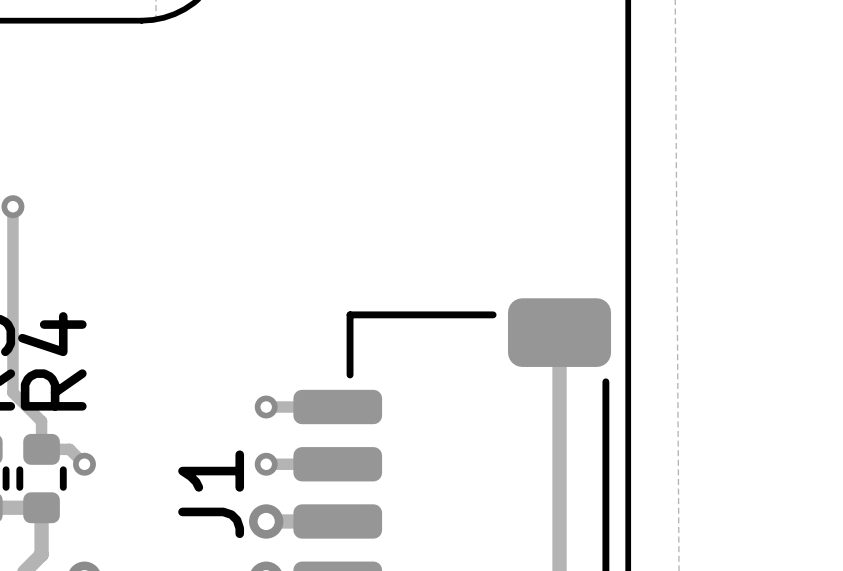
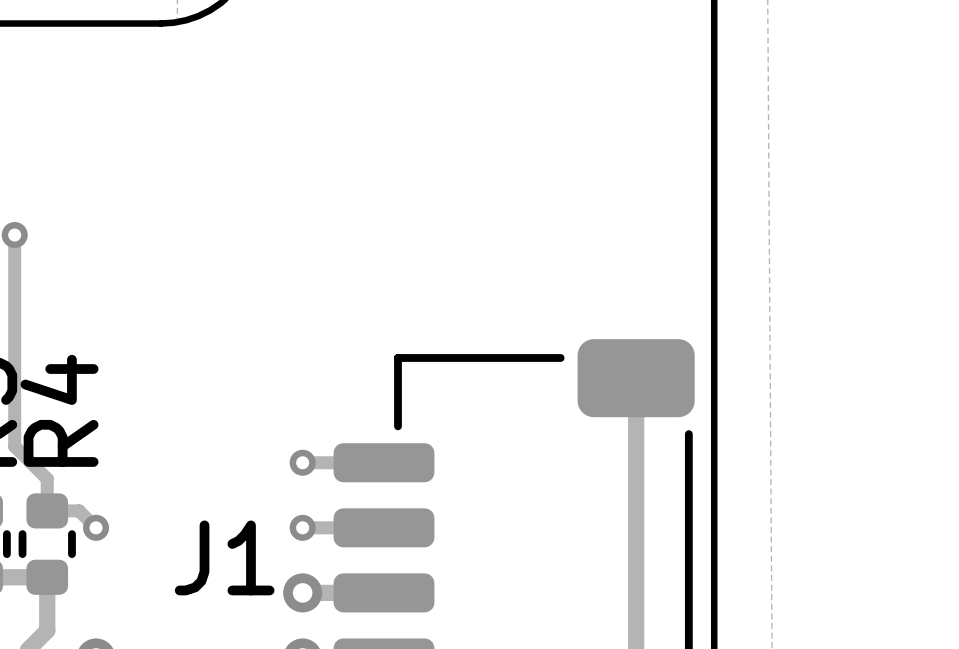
J1 name rotation: 0° (211, 494) -> 90° clockwise (224, 557)

